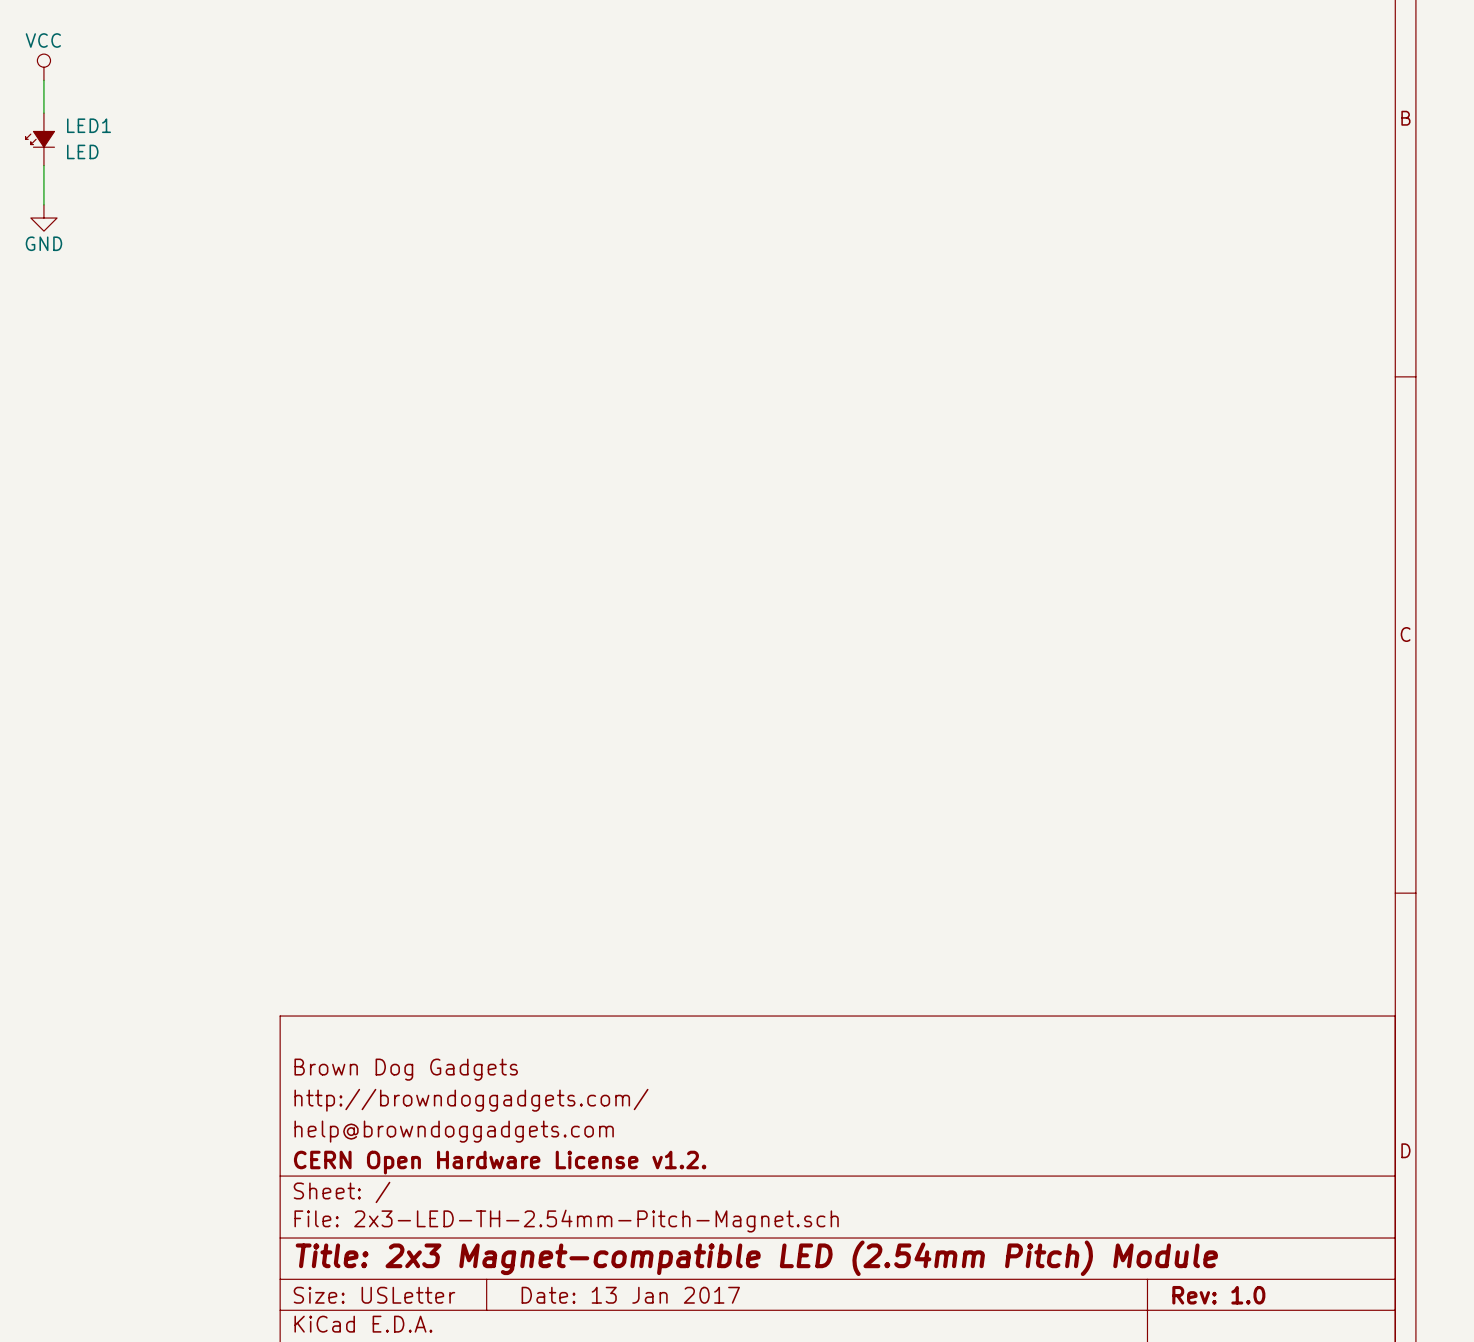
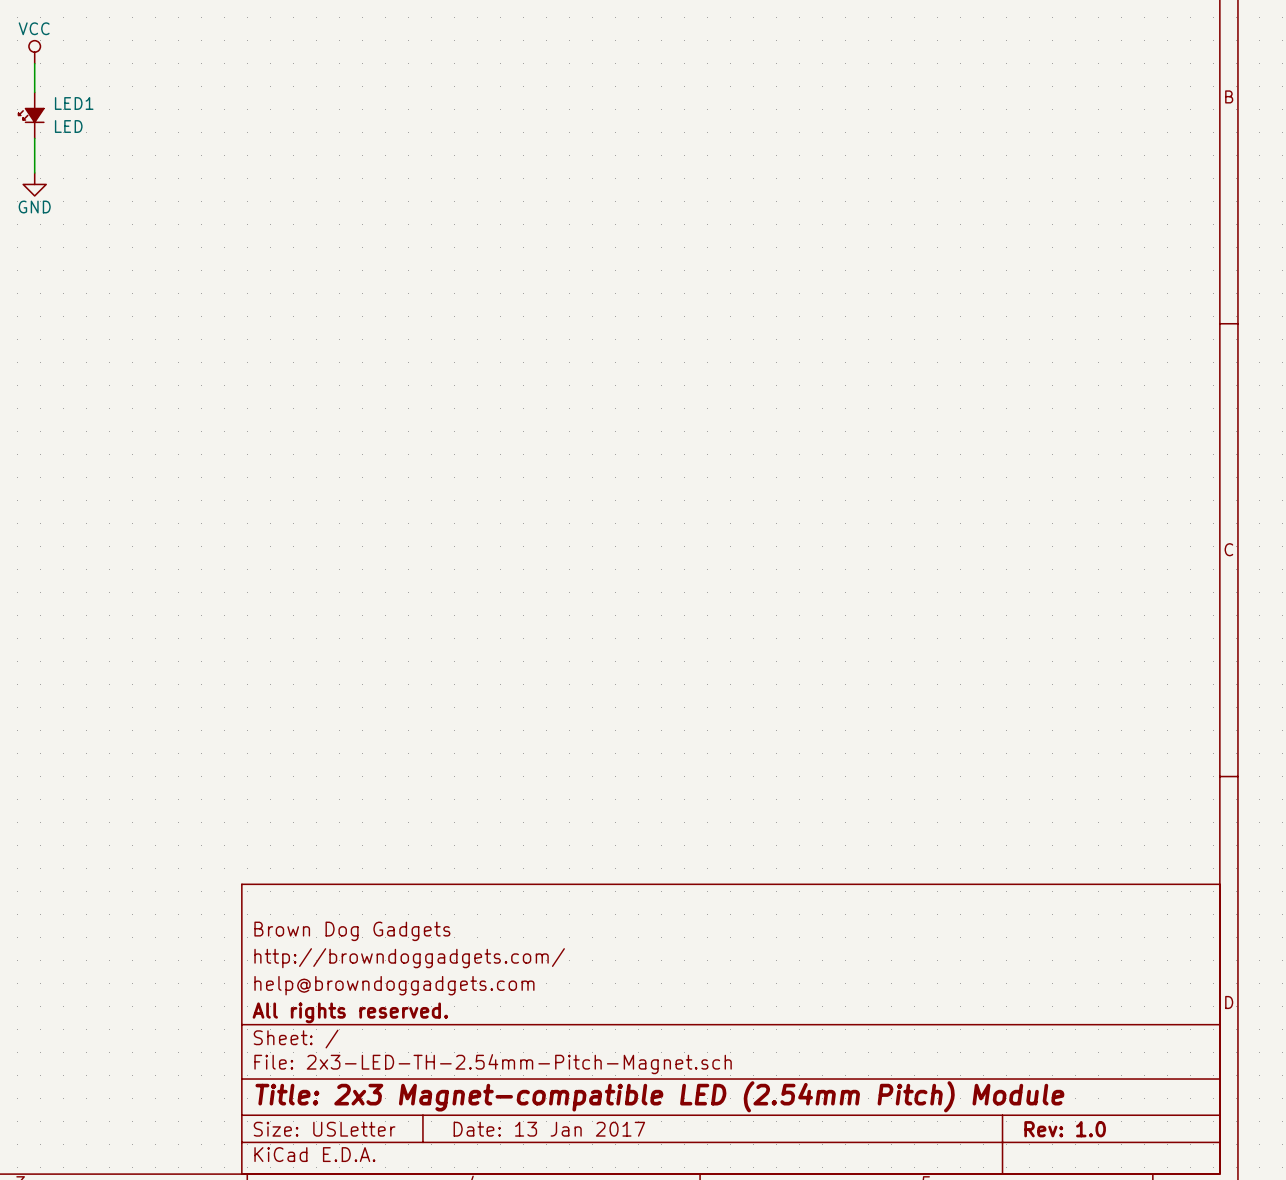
title block: CERN Open Hardware License v1.2. (500, 1162) -> All rights reserved. (350, 1012)

